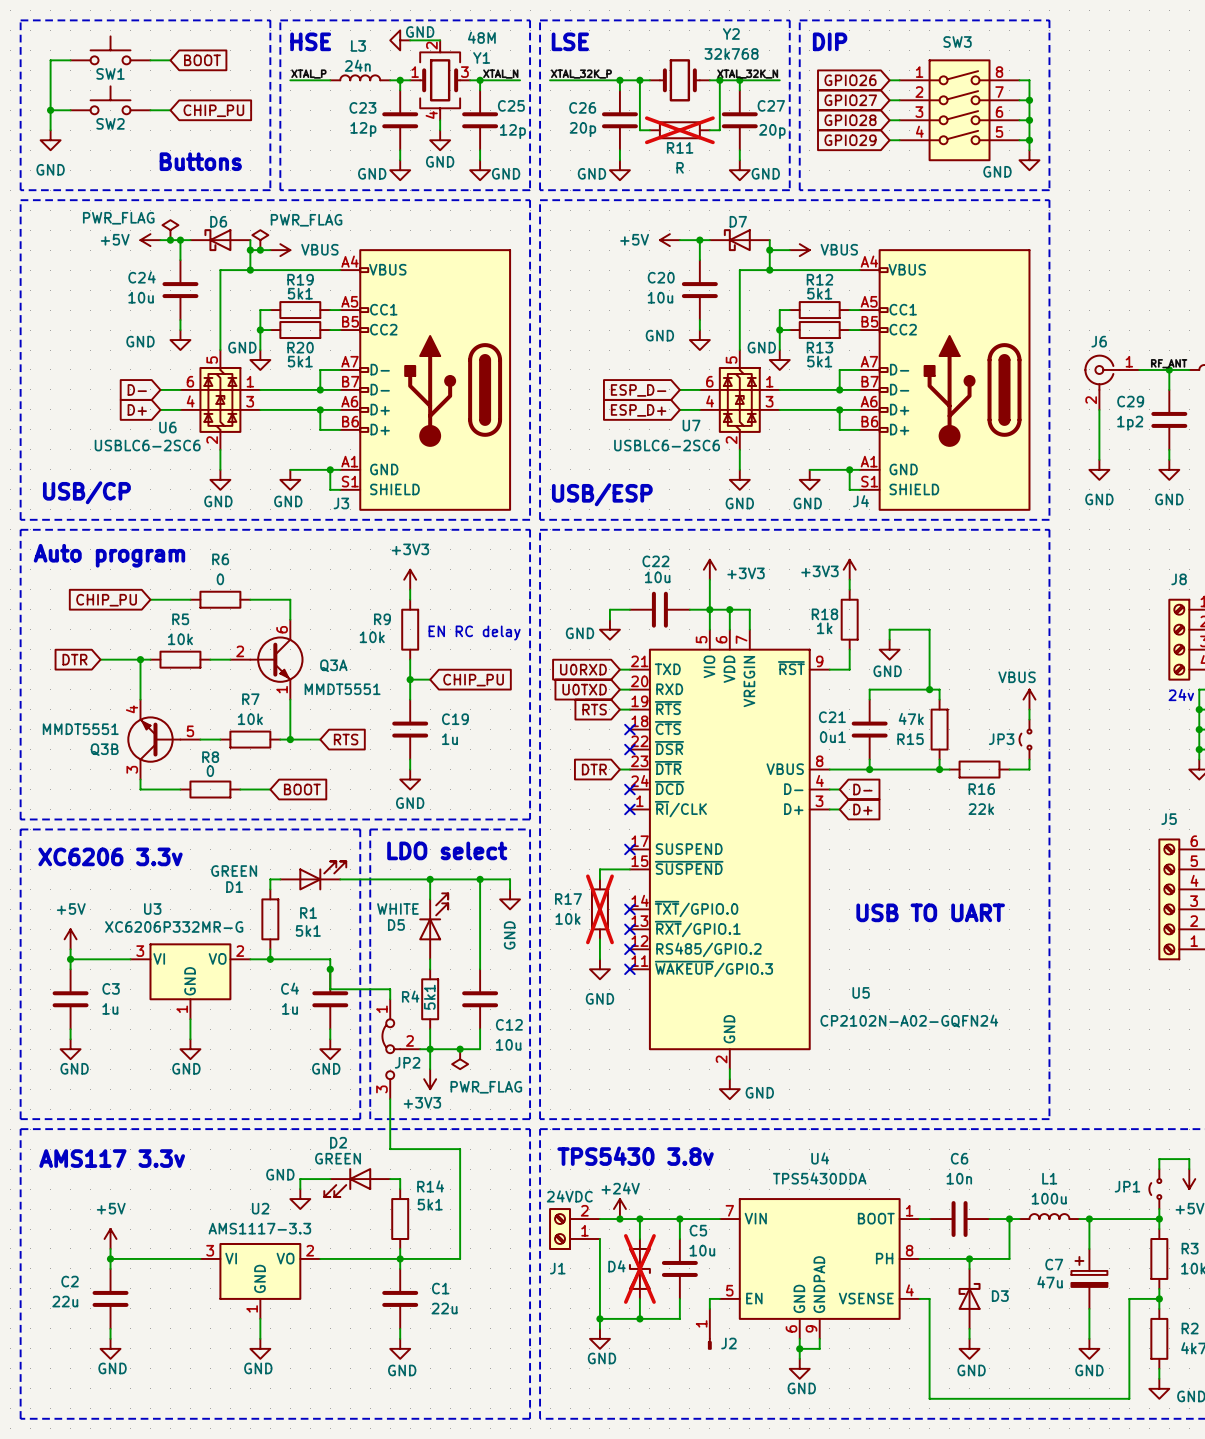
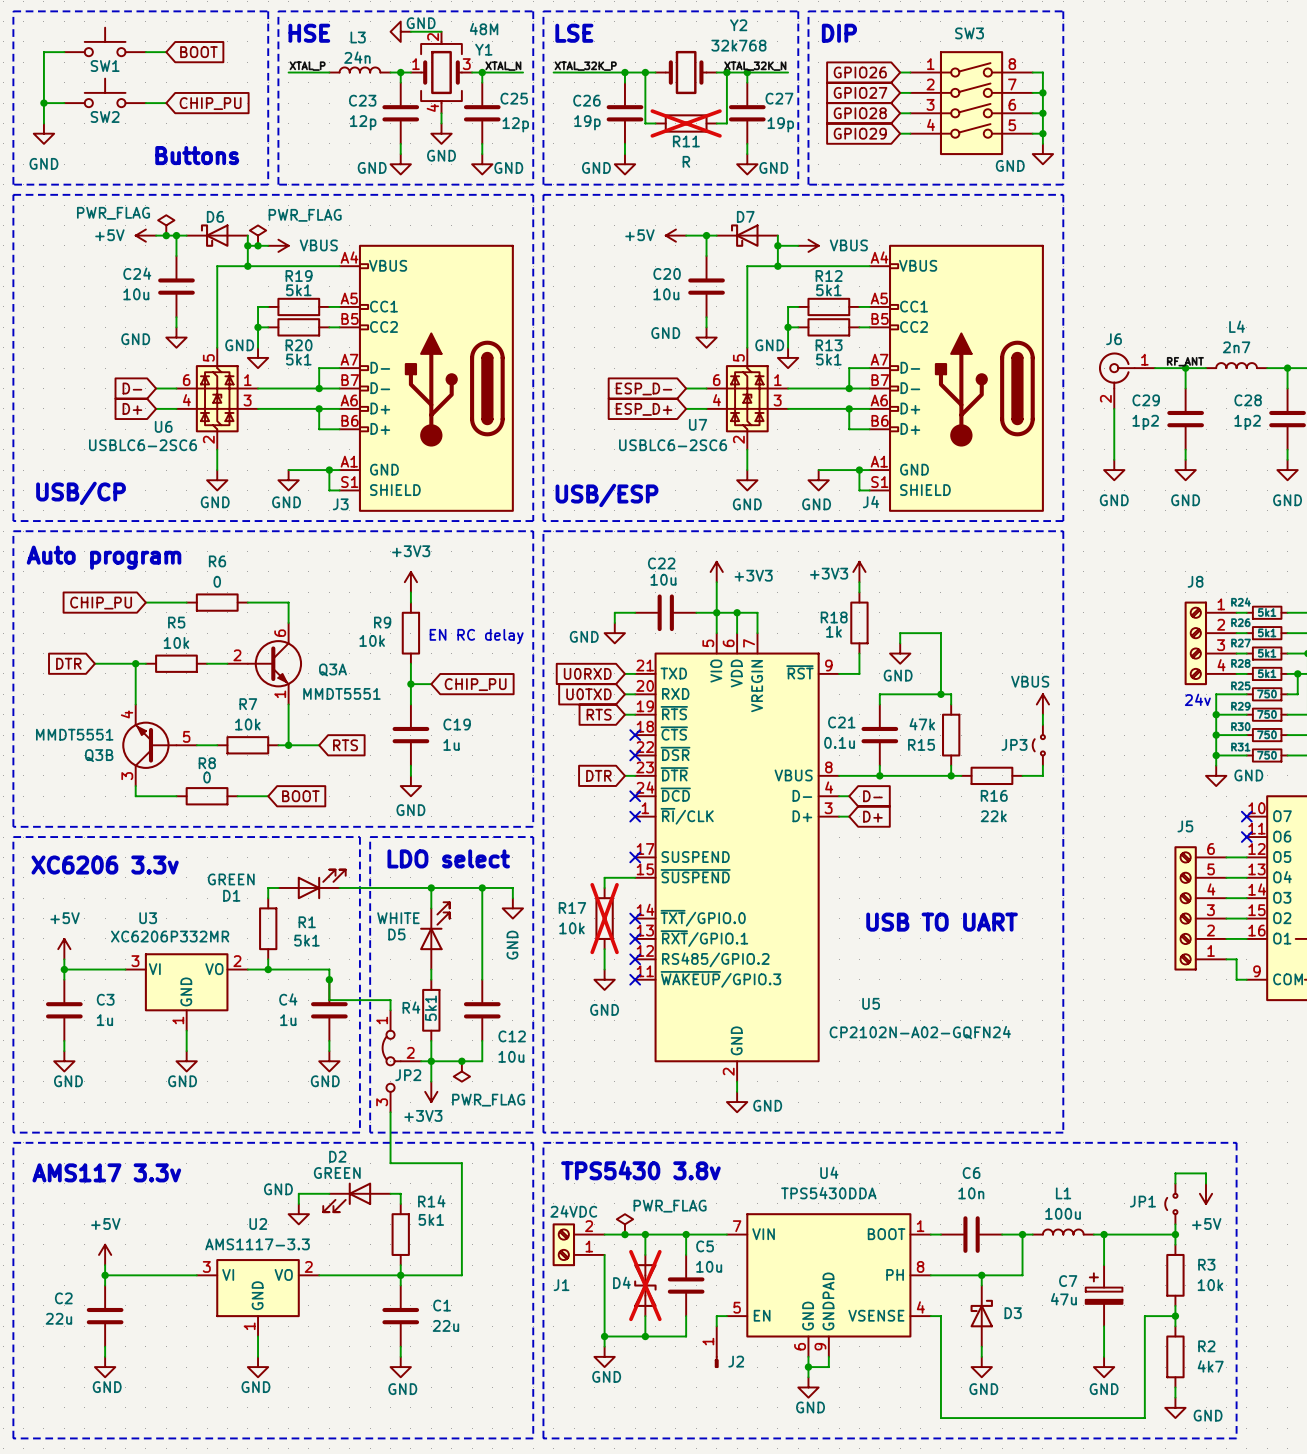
C26 value: 20p (582, 129) -> 19p (587, 122)
C27 value: 20p (772, 131) -> 19p (780, 124)
C21 value: 0u1 (832, 737) -> 0.1u (839, 742)
U3 value: XC6206P332MR-G (174, 926) -> XC6206P332MR (170, 936)
power symbol: +24V (619, 1209) -> PWR_FLAG (624, 1224)

